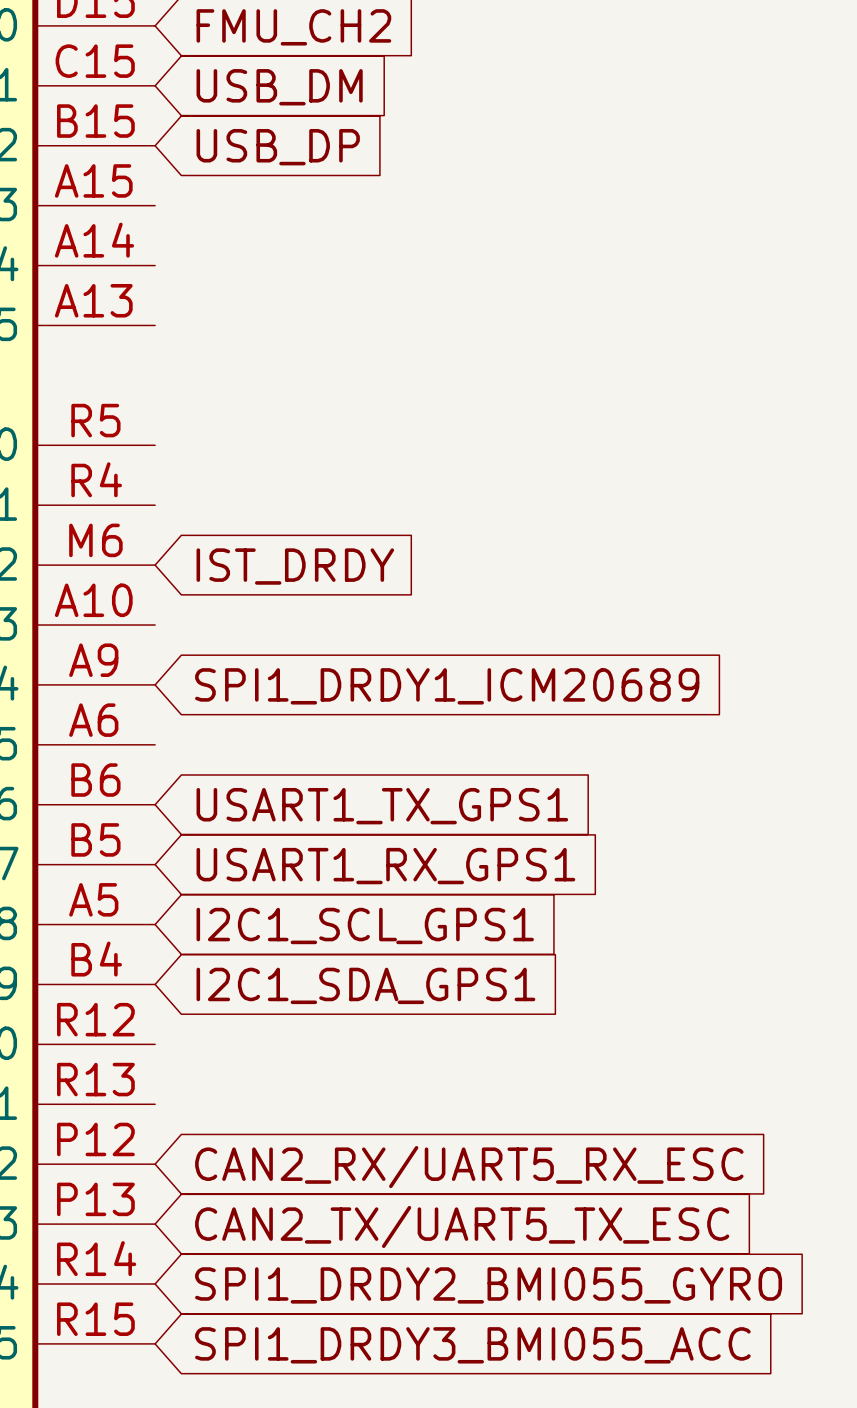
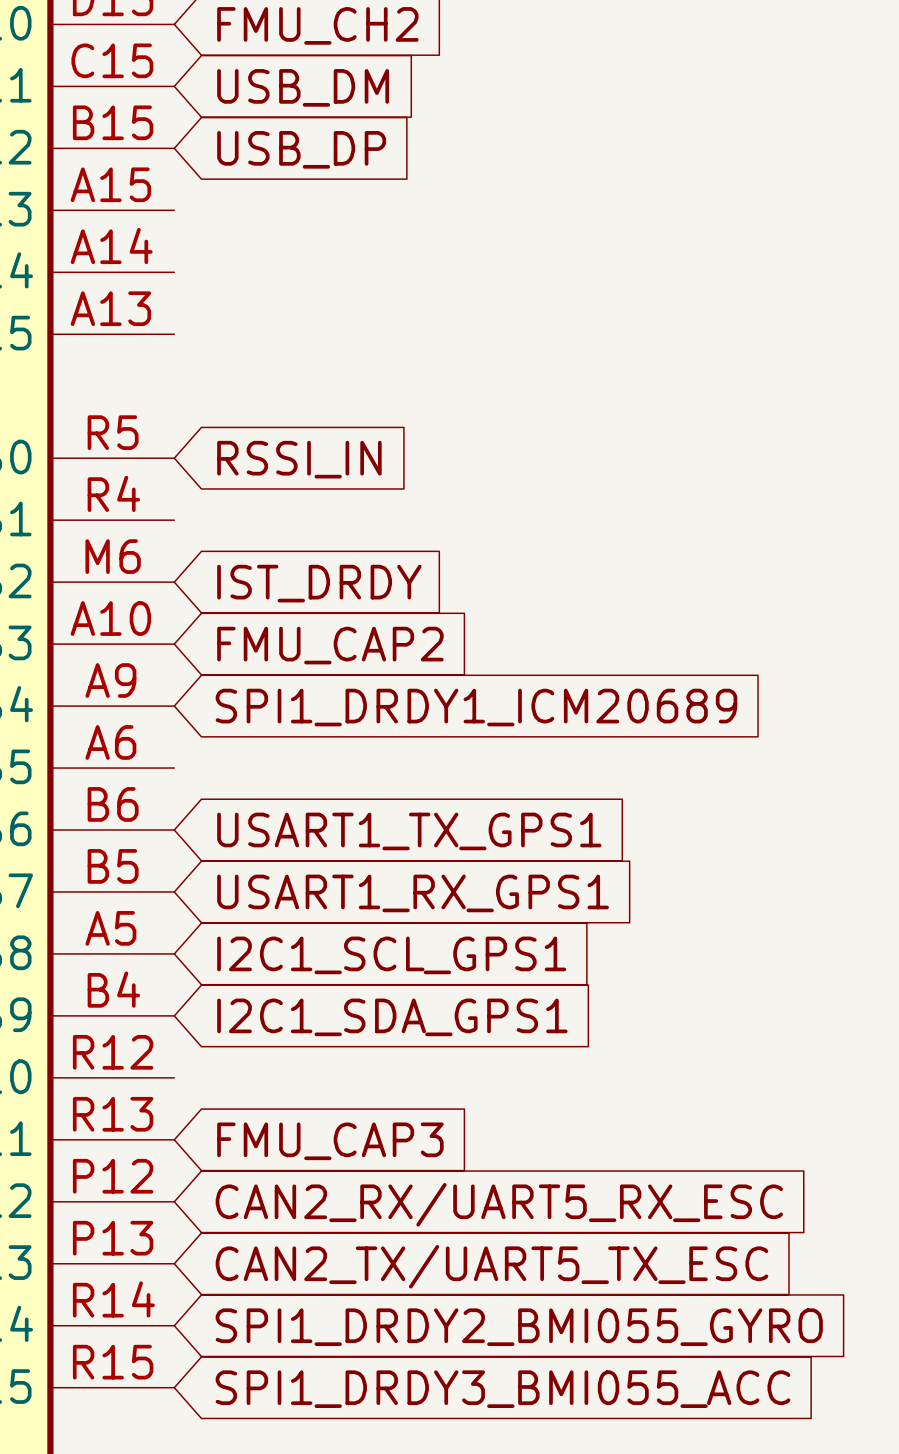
global label: none -> RSSI_IN (299, 459)
global label: none -> FMU_CAP2 (330, 645)
global label: none -> FMU_CAP3 (330, 1141)

